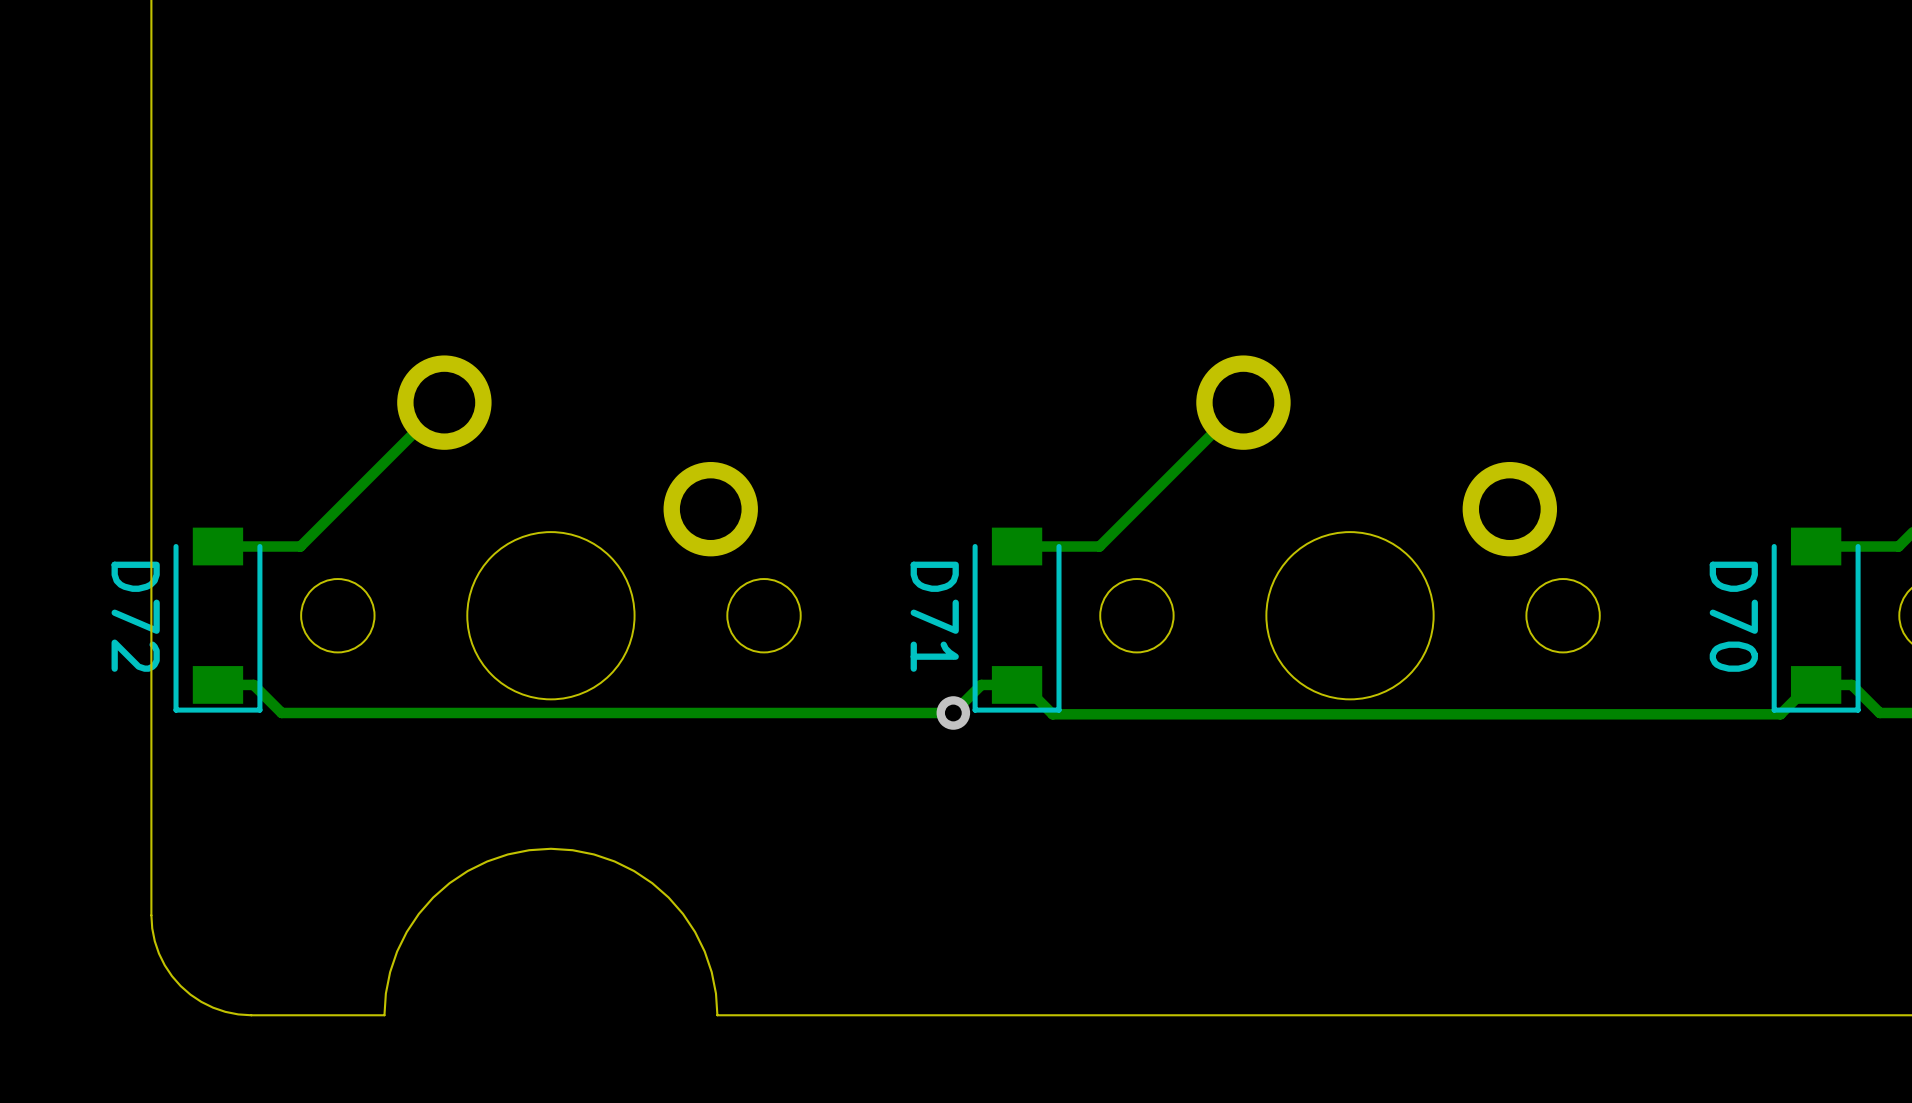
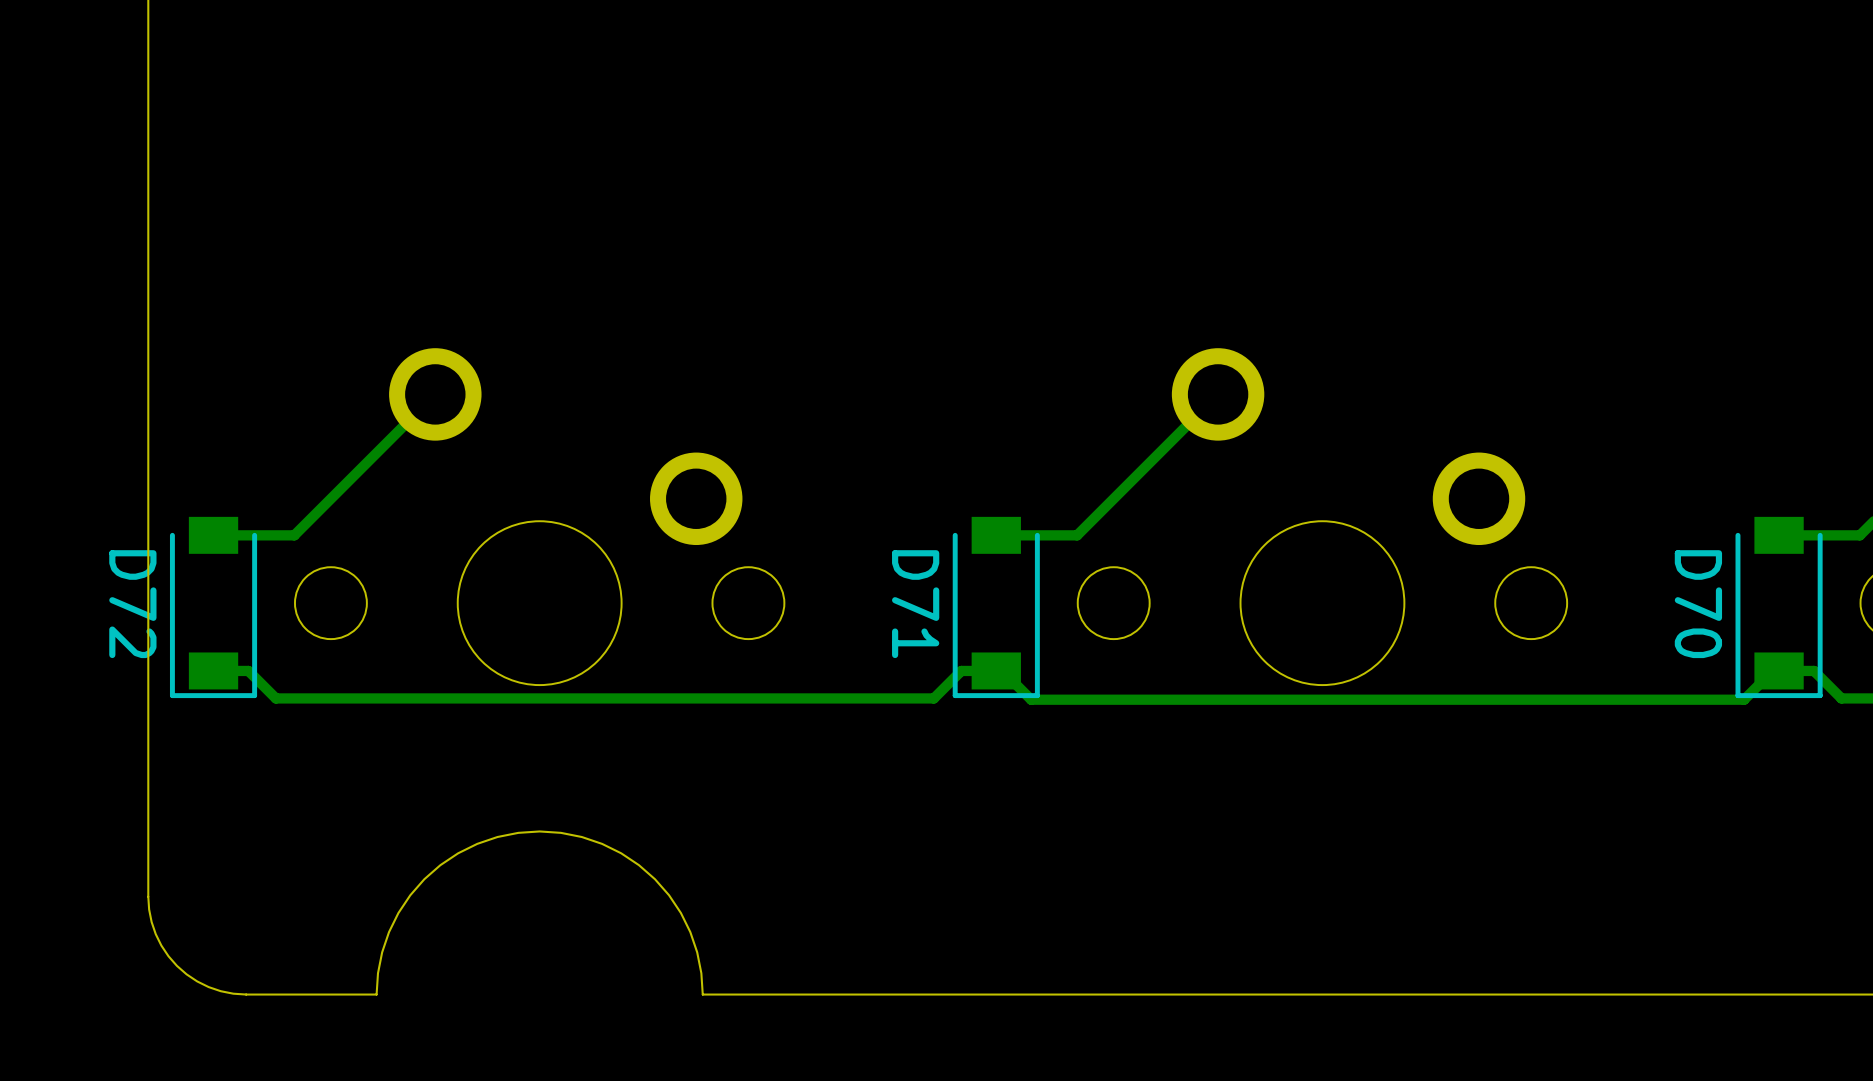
via: (953, 712) -> none

